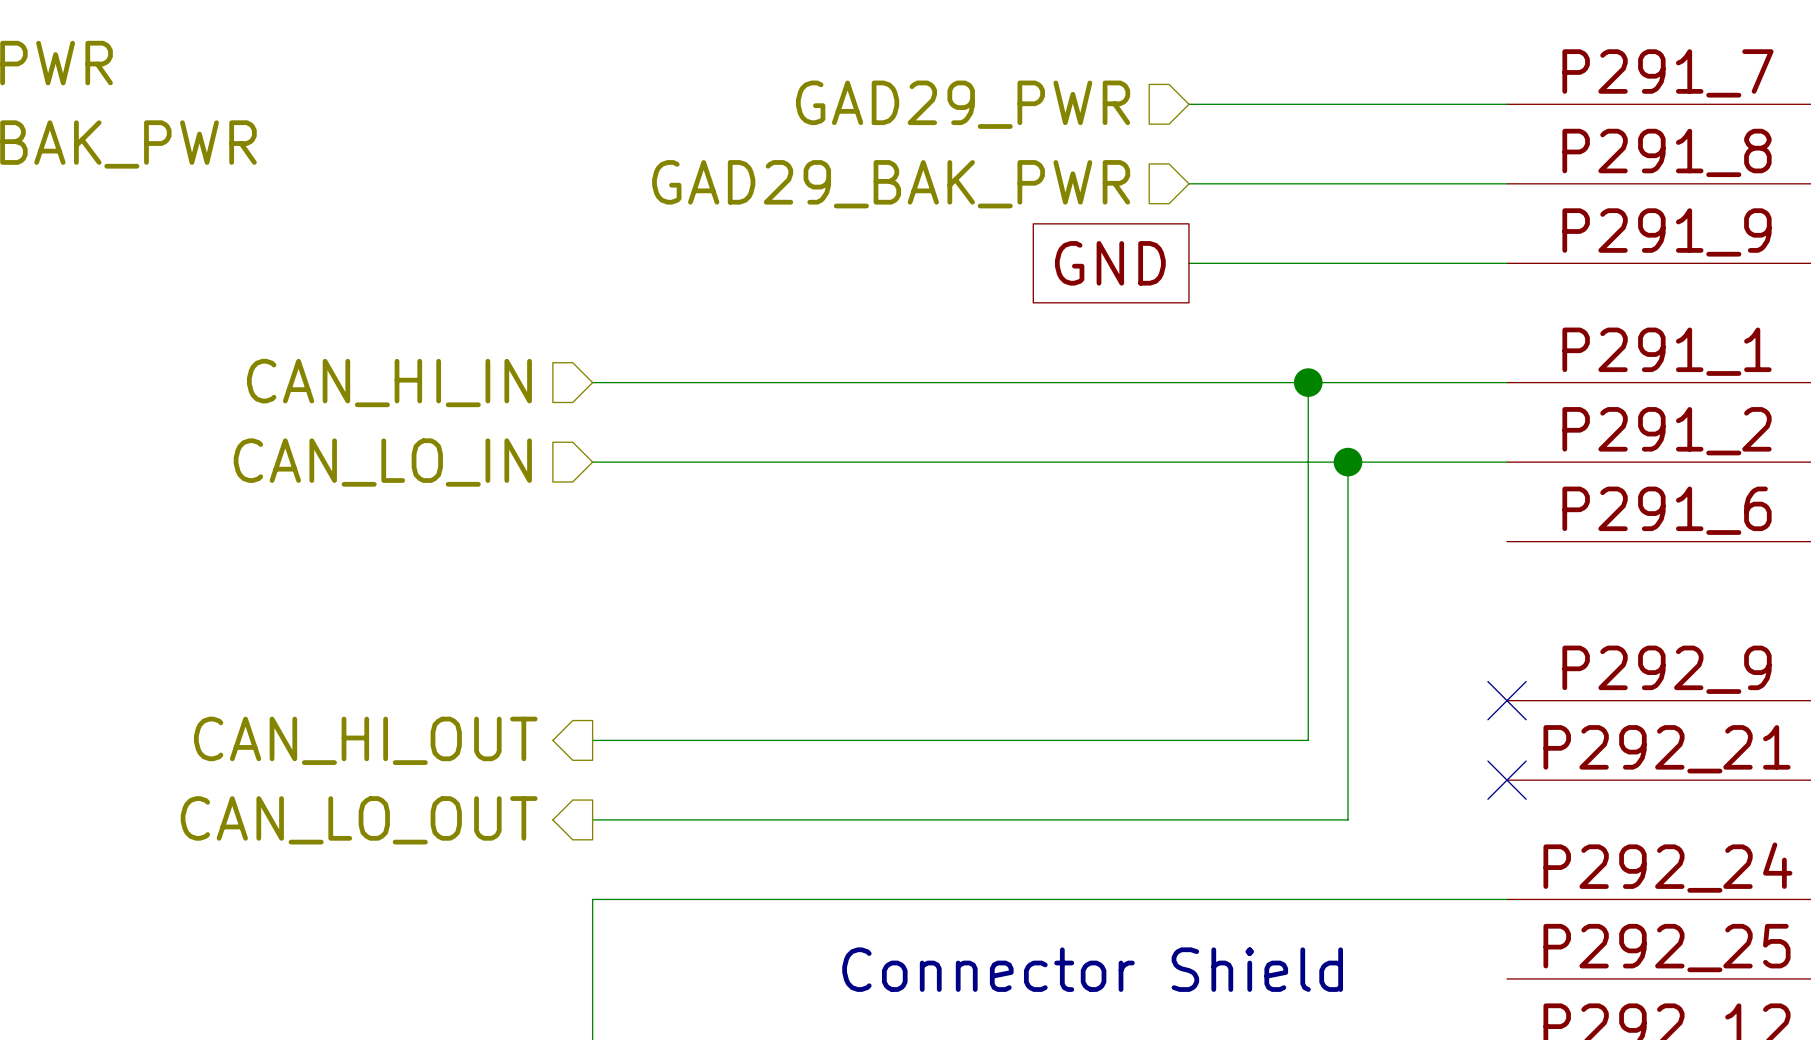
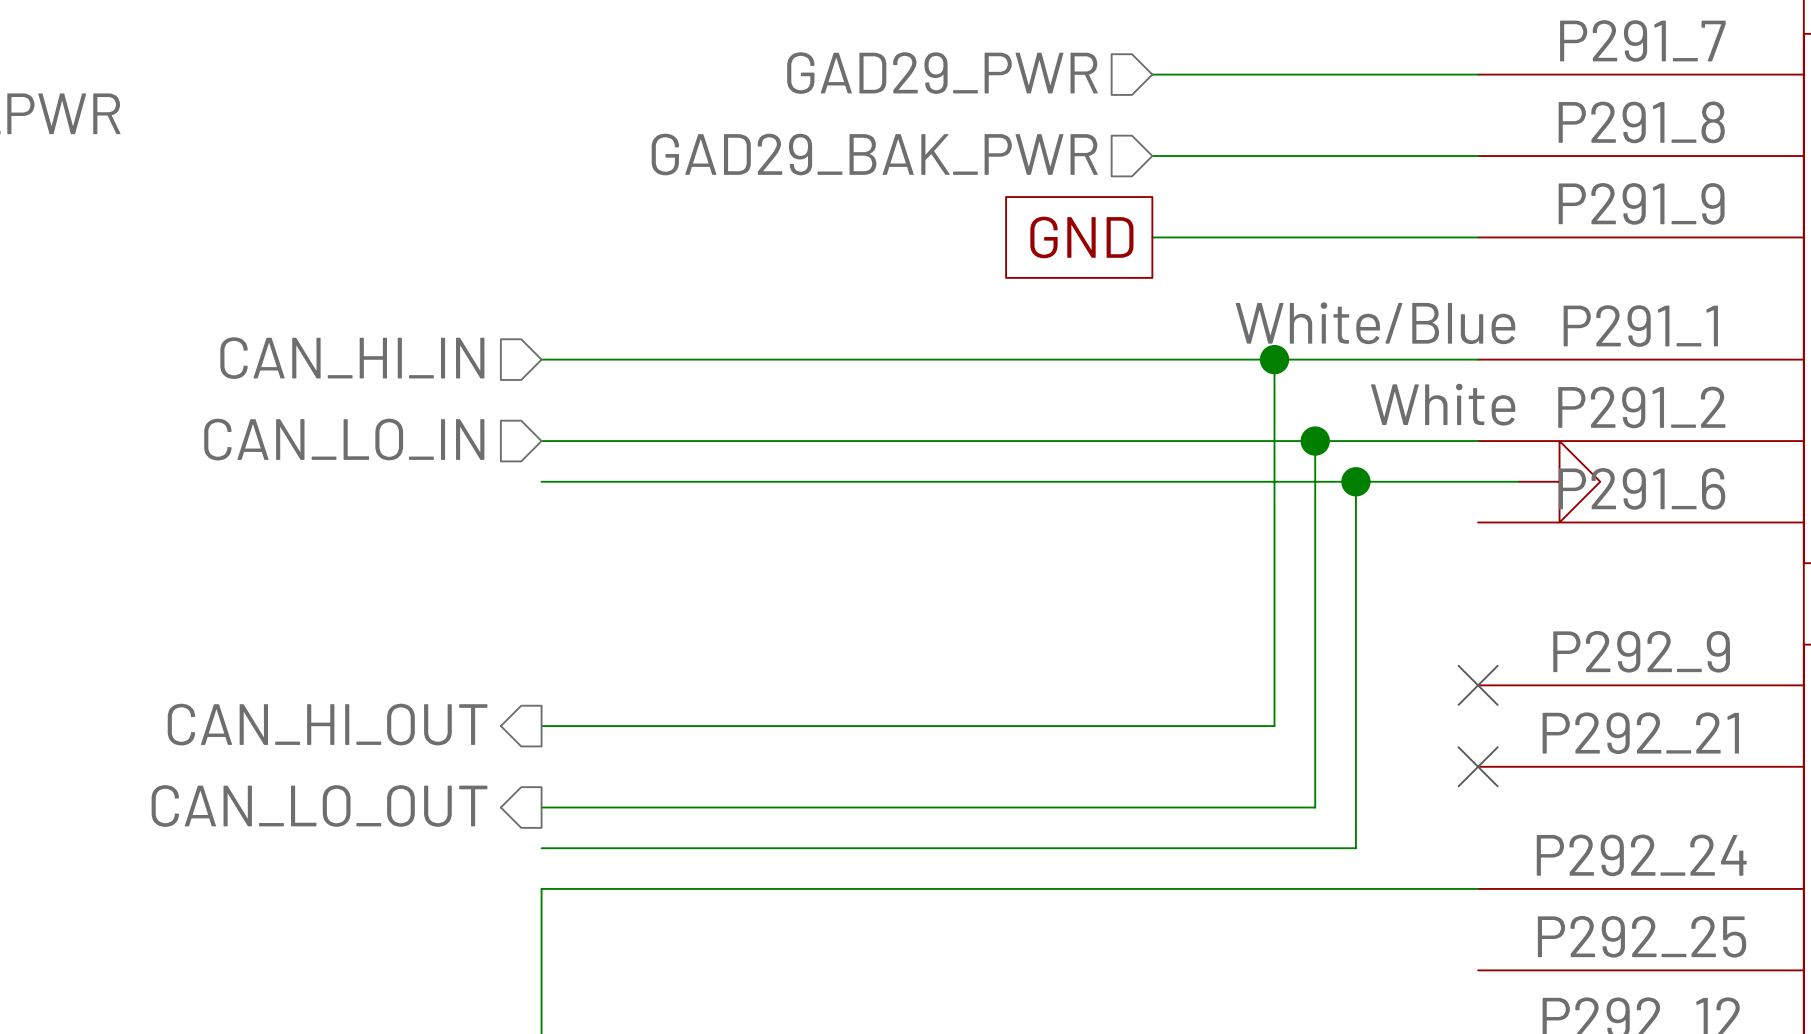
label: none -> White/Blue (1375, 323)
label: none -> White (1443, 404)
wire: none -> (541, 481) (1518, 481)
wire: none -> (1355, 481) (1355, 848) (541, 848)
junction: none -> (1355, 481)
power symbol: none -> (1559, 481)
text: Connector Shield (1092, 969) -> none

